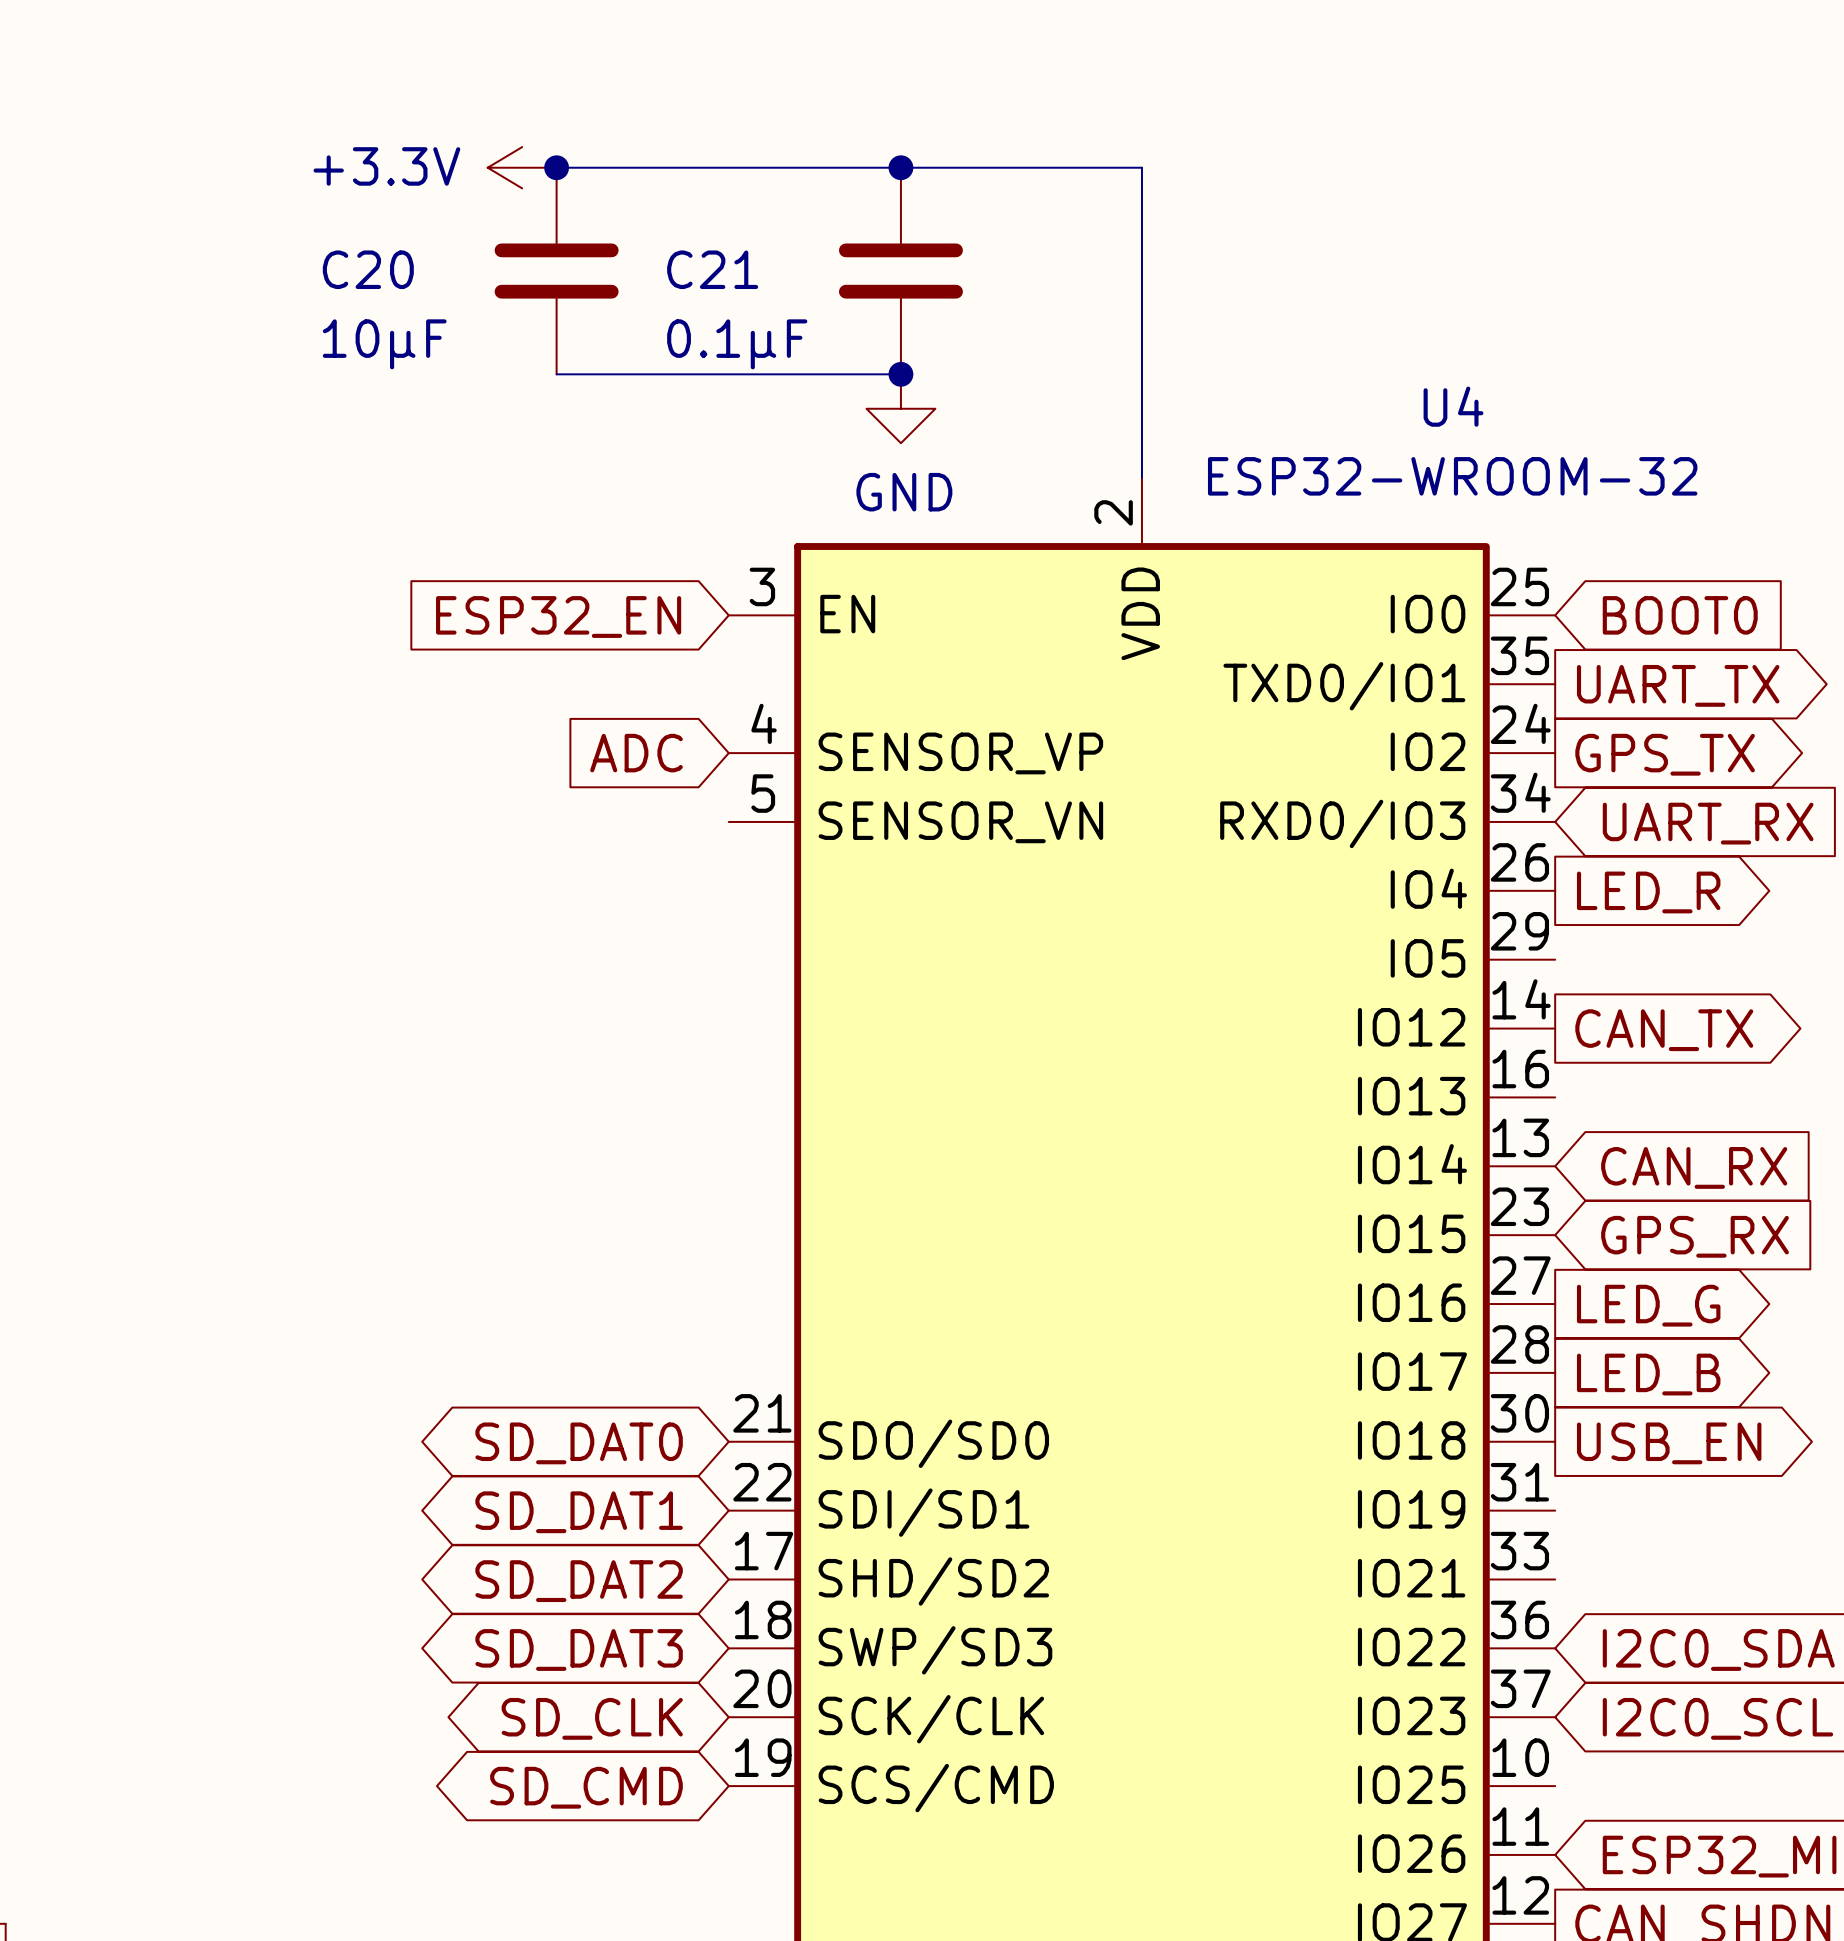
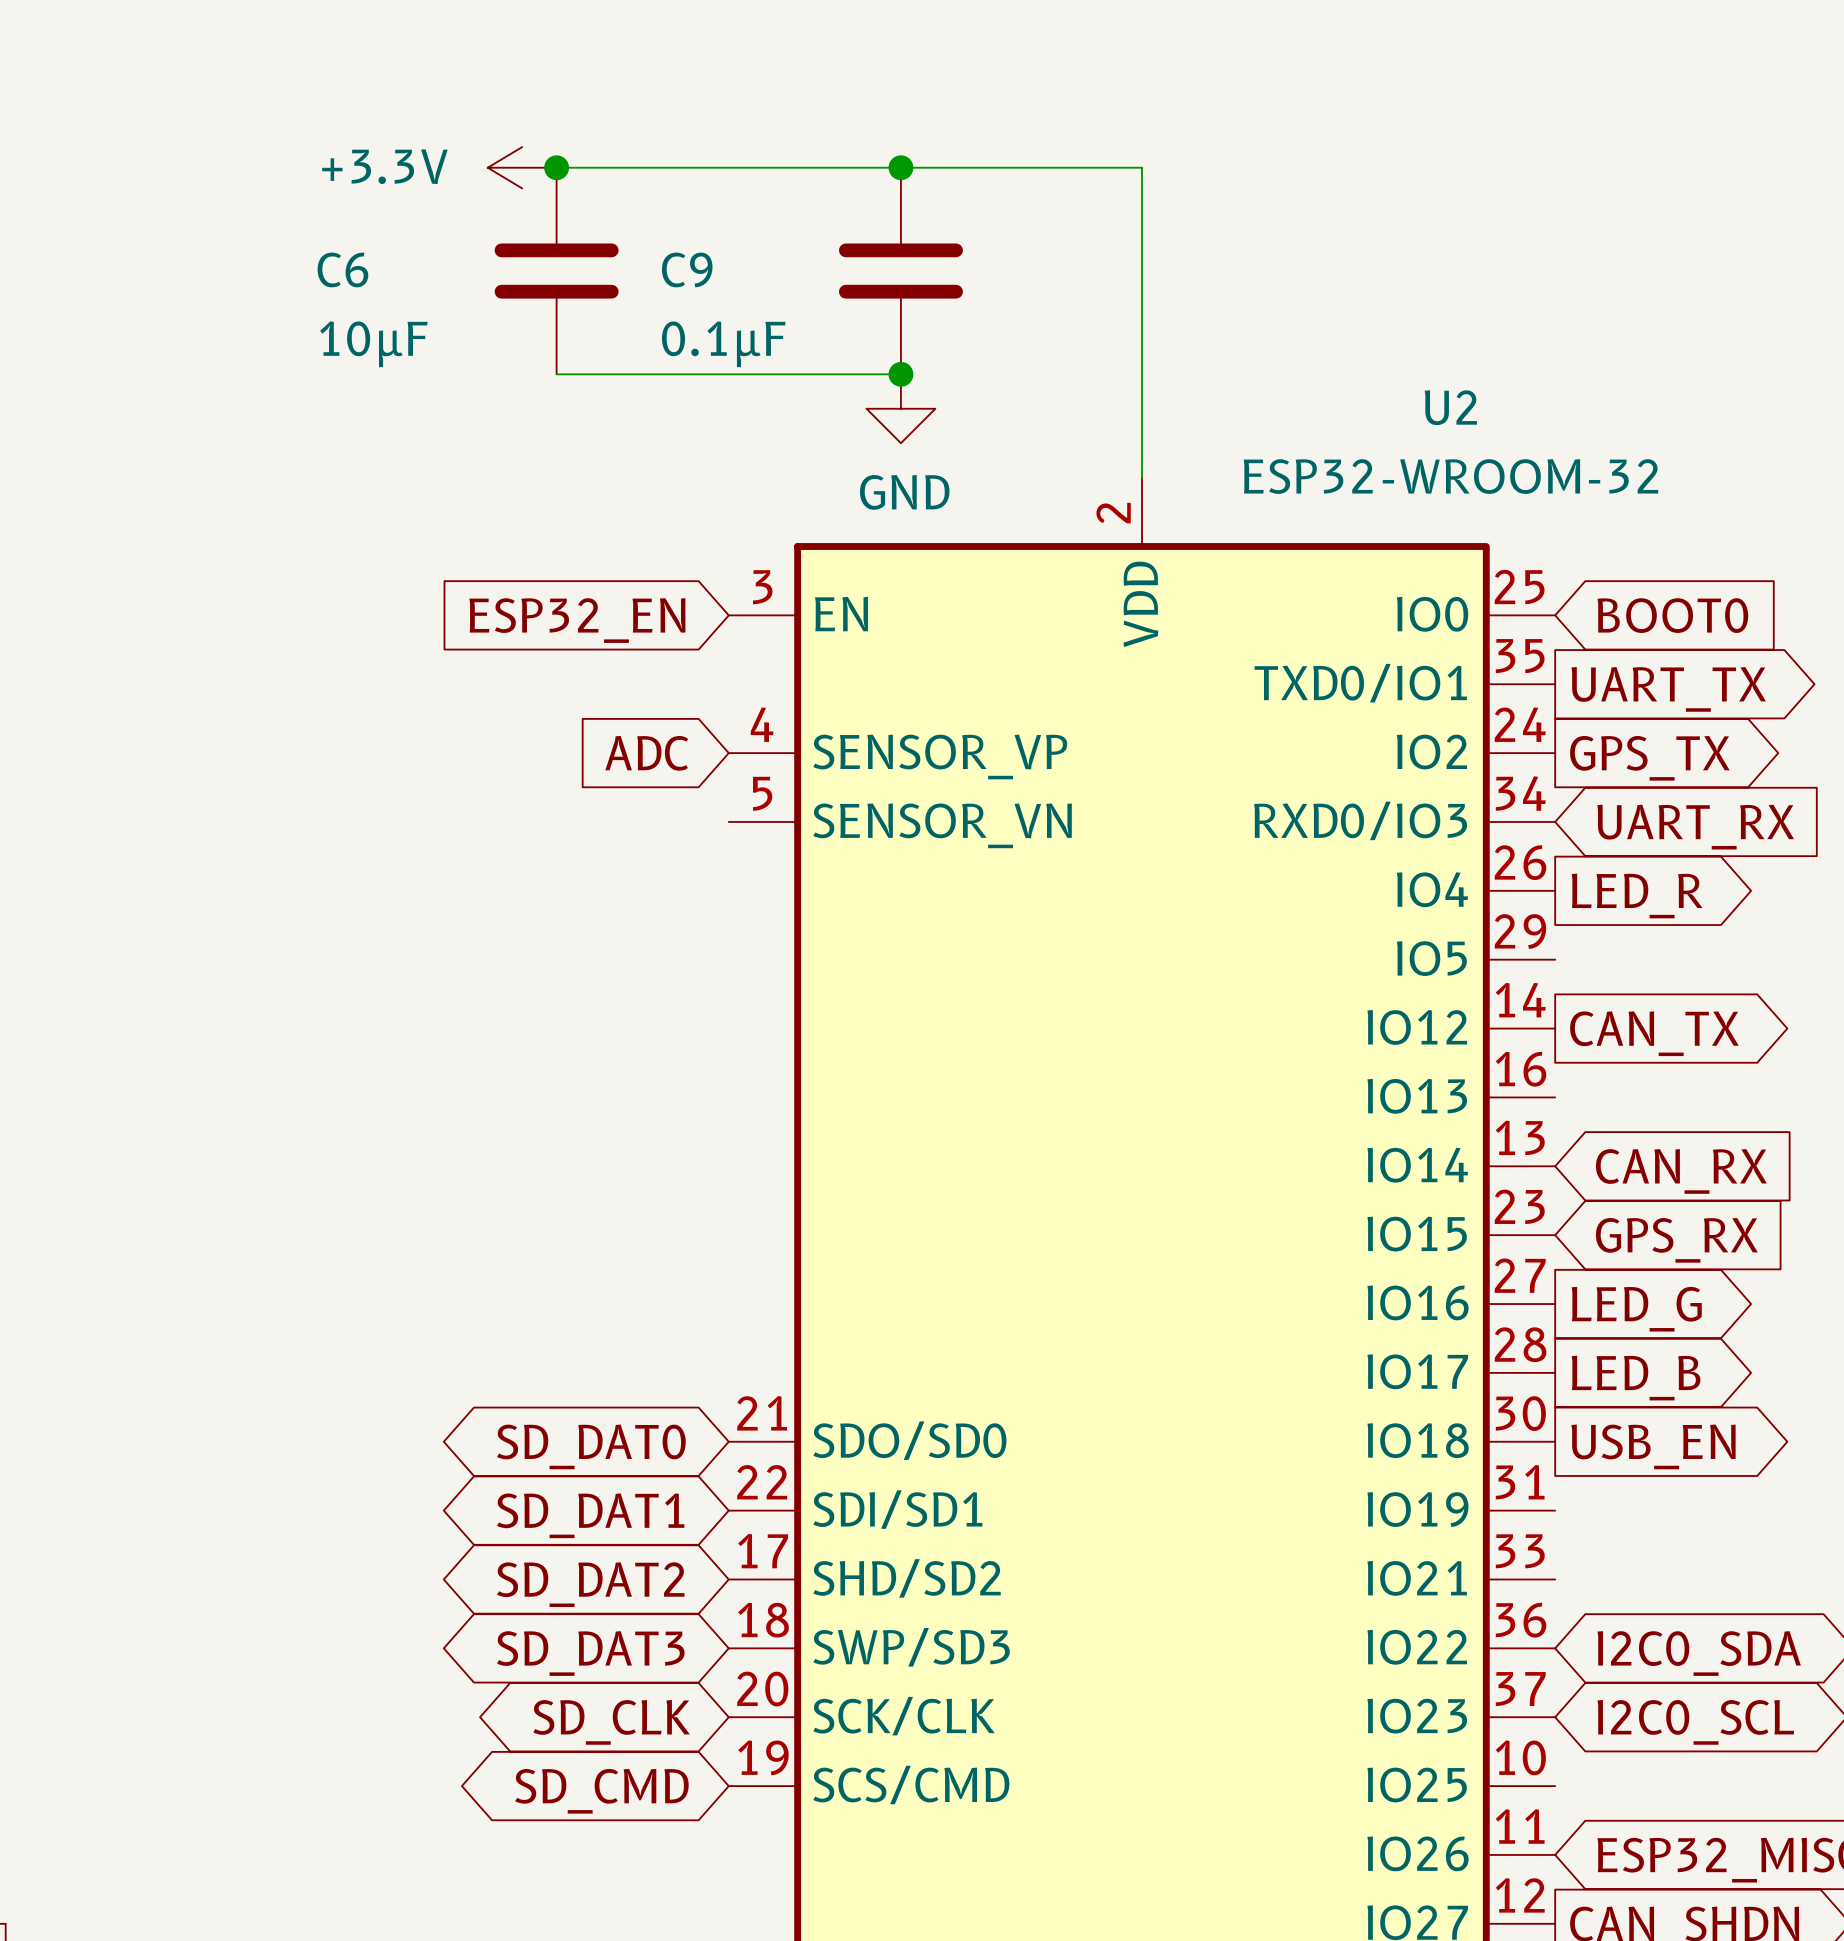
C20 name: C20 (368, 269) -> C6 (342, 269)
C21 name: C21 (712, 269) -> C9 (687, 269)
U4 name: U4 (1453, 406) -> U2 (1450, 407)

